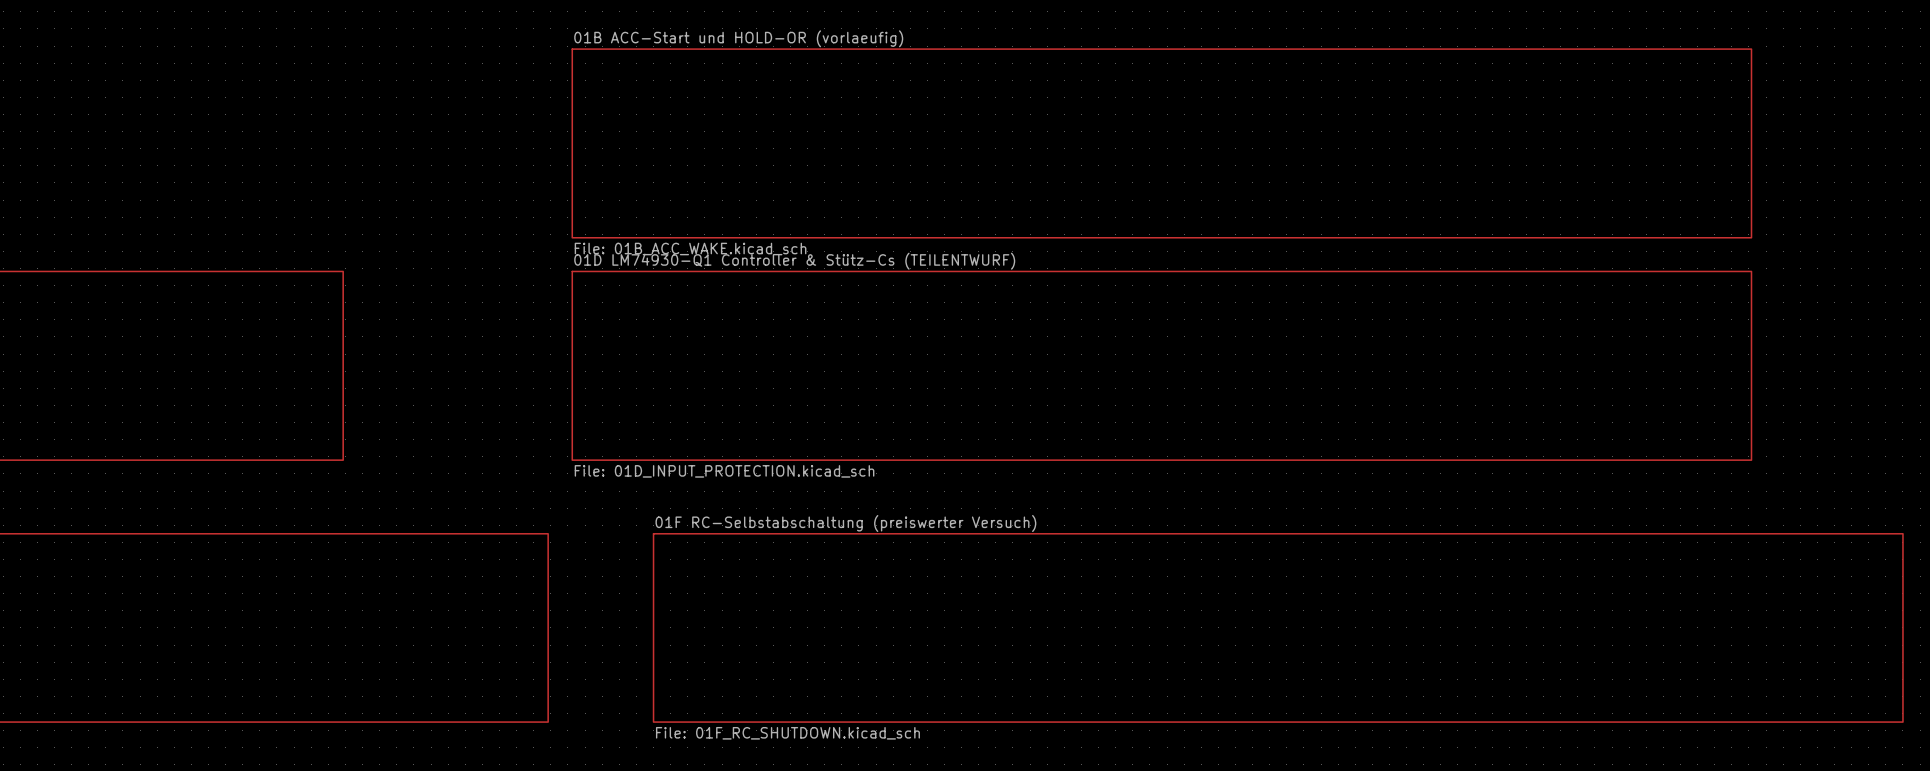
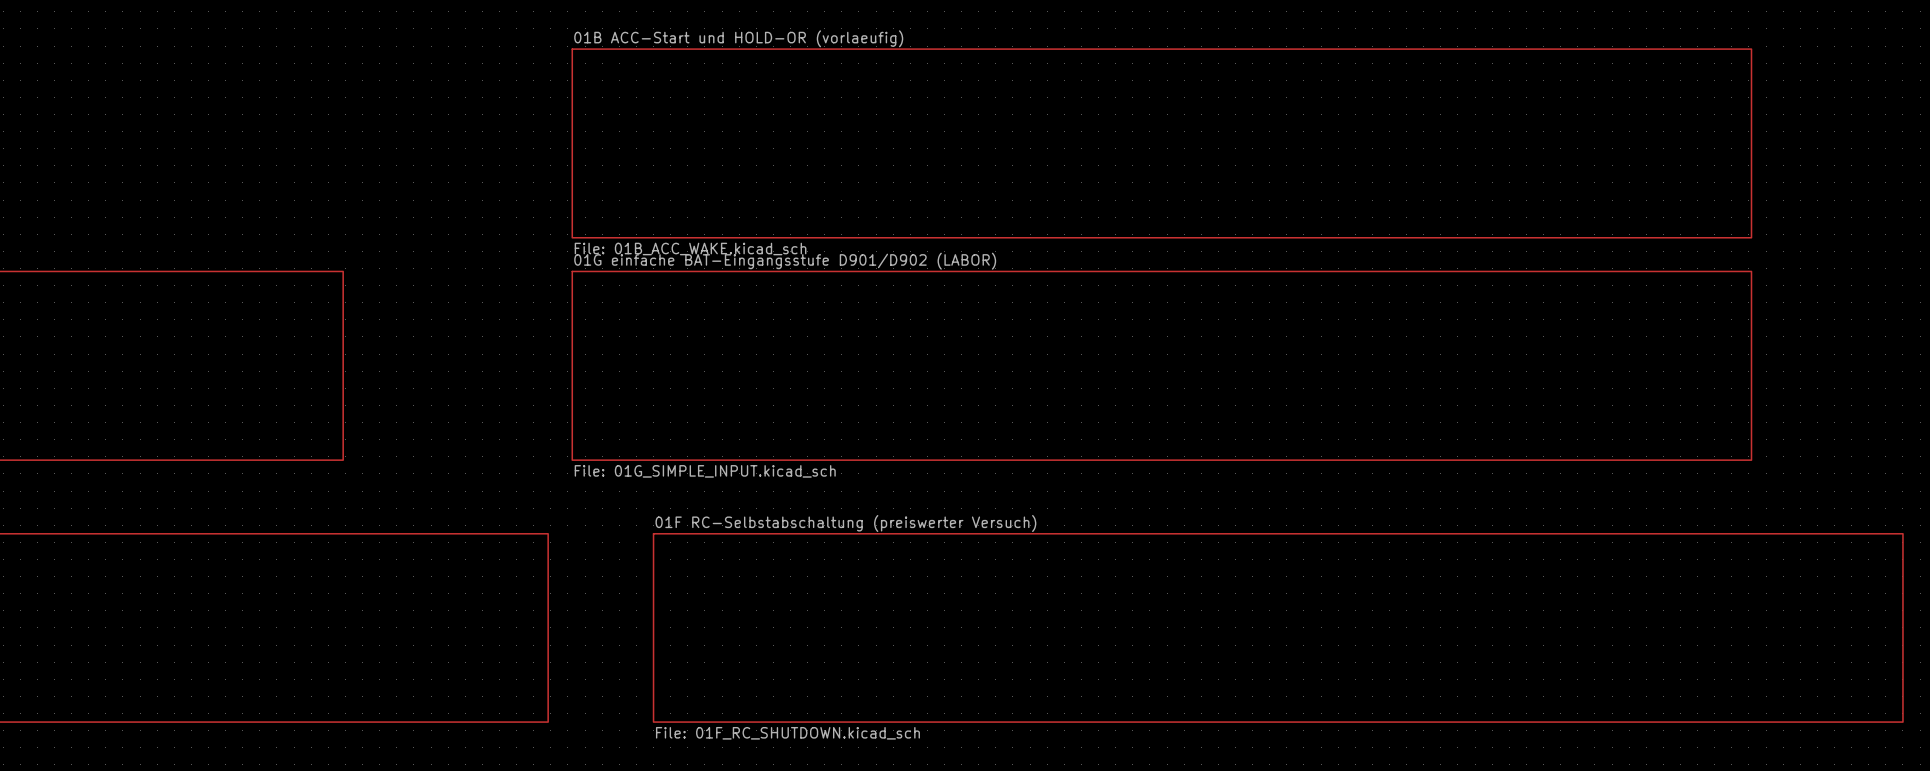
sheet 01D LM74930-Q1 Controller & Stütz-Cs (TEILENTWURF) name: 01D LM74930-Q1 Controller & Stütz-Cs (TEILENTWURF) (794, 261) -> 01G einfache BAT-Eingangsstufe D901/D902 (LABOR) (785, 261)
sheet 01D LM74930-Q1 Controller & Stütz-Cs (TEILENTWURF) value: File: 01D_INPUT_PROTECTION.kicad_sch (724, 471) -> File: 01G_SIMPLE_INPUT.kicad_sch (705, 471)

